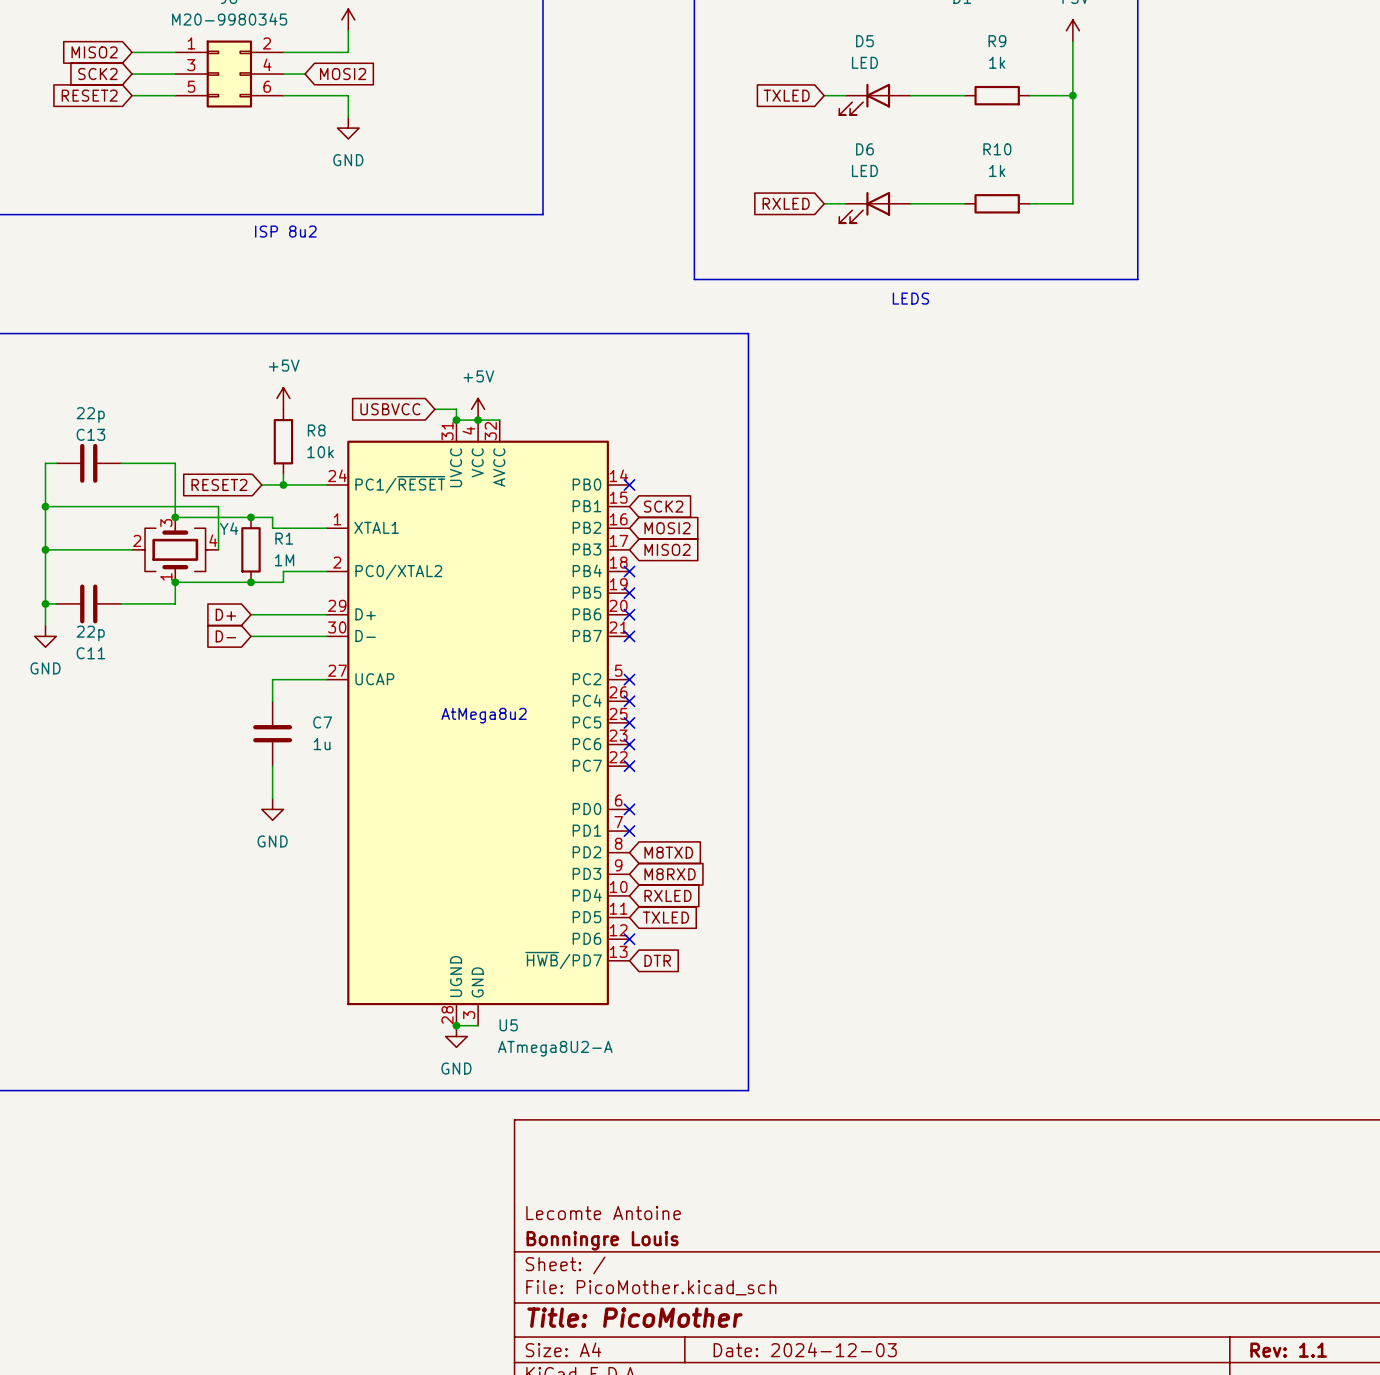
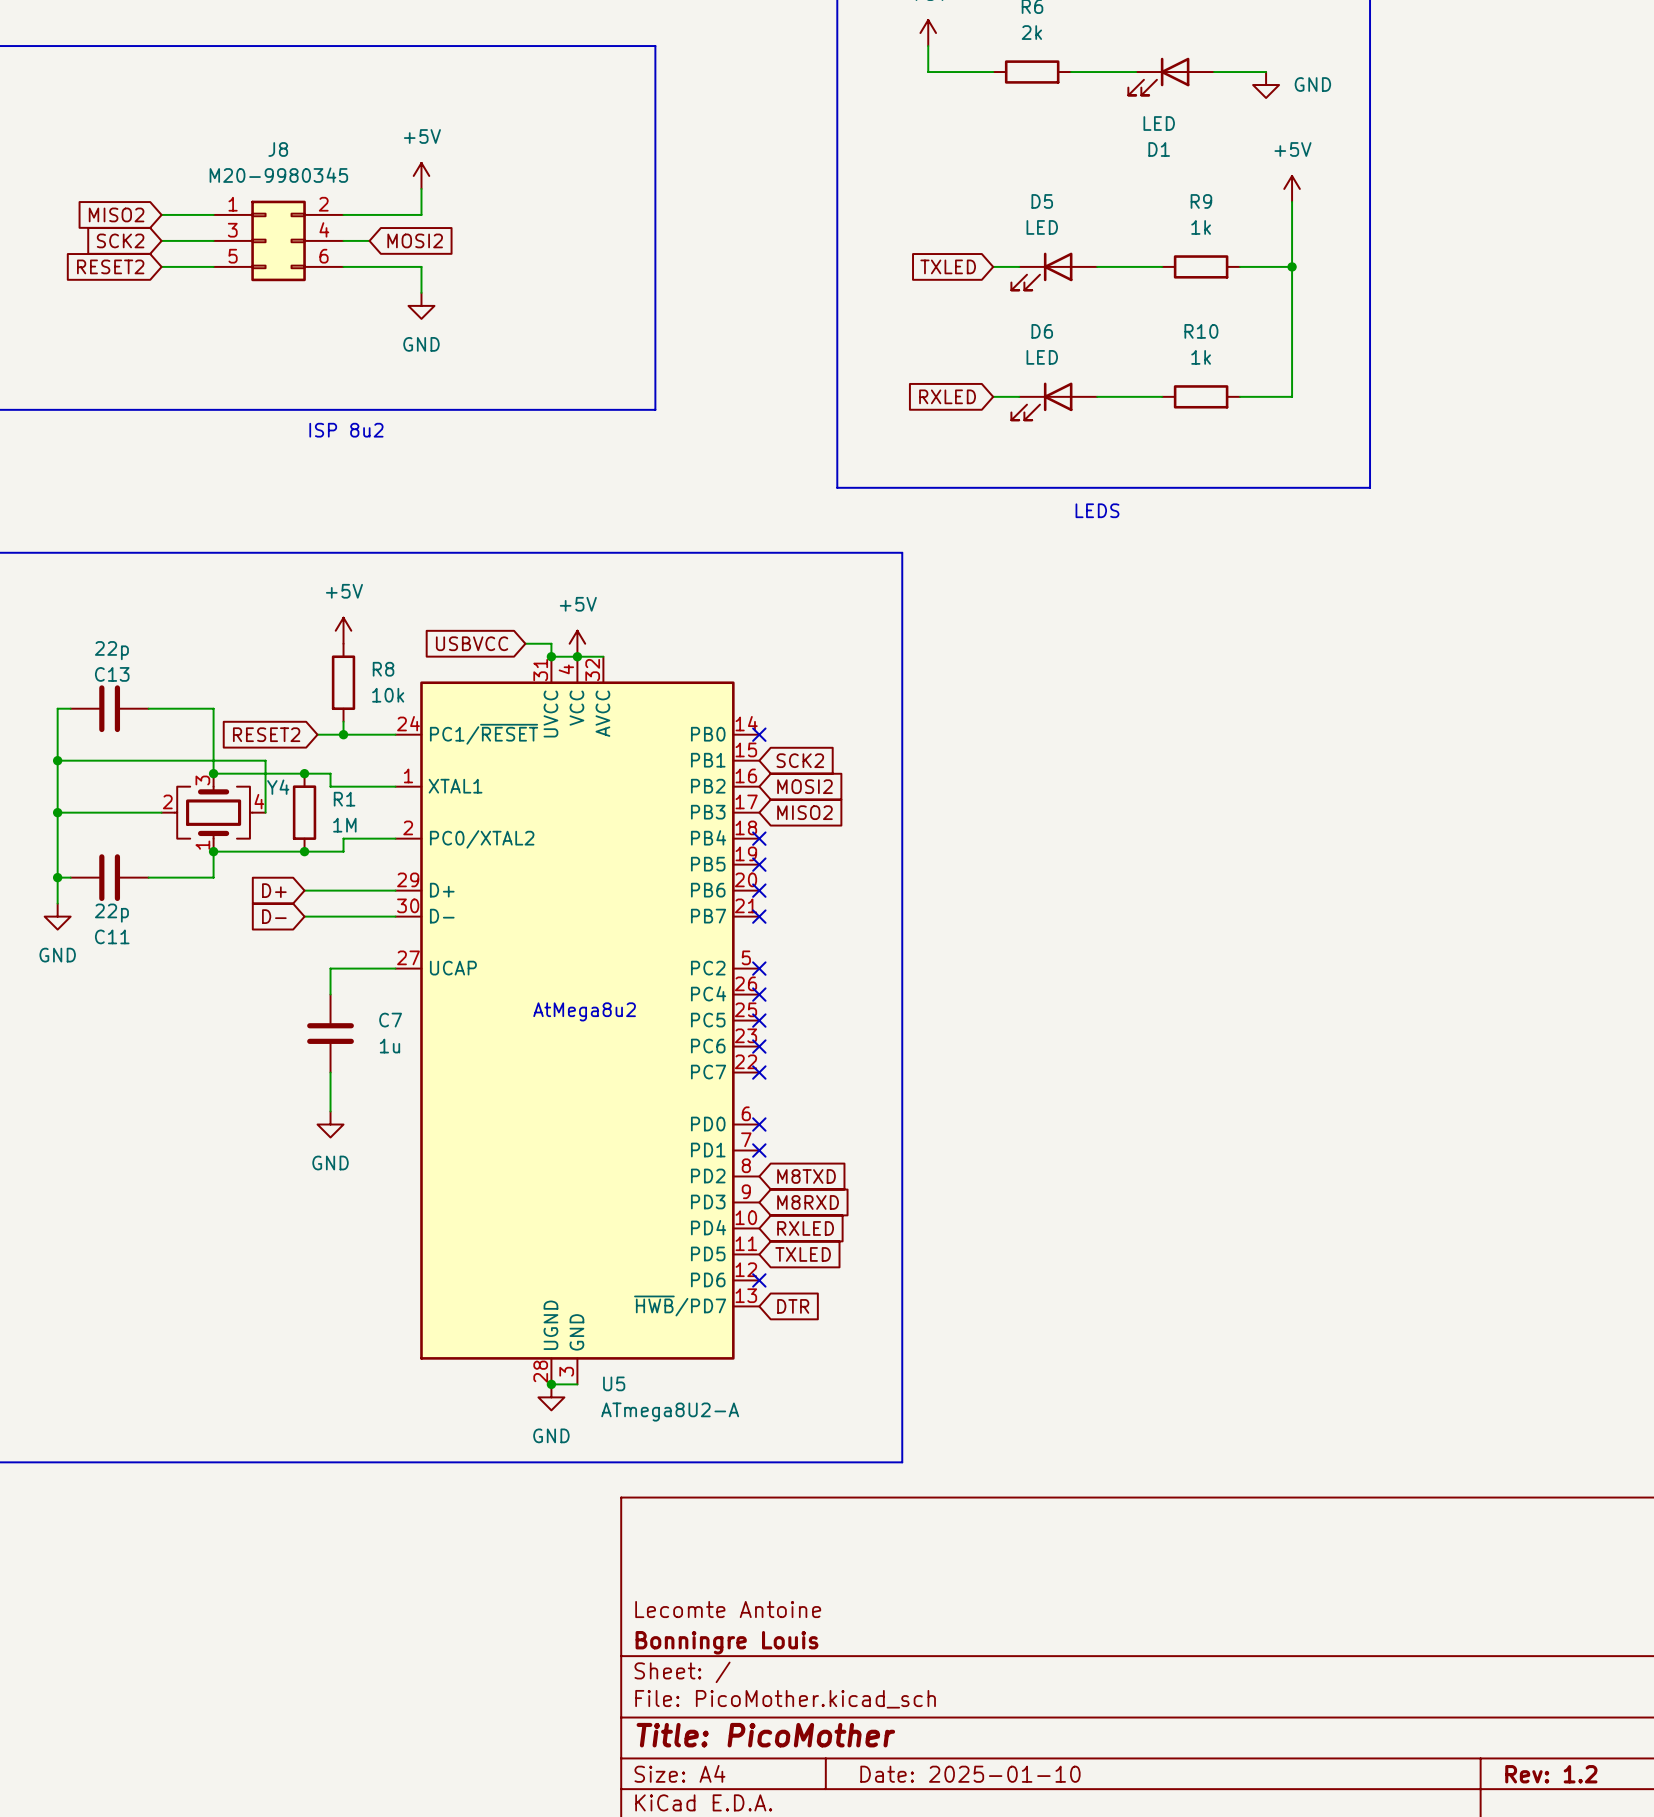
title block: Date: 2024-12-03 (805, 1349) -> Date: 2025-01-10 (970, 1774)
title block: Rev: 1.1 (1288, 1350) -> Rev: 1.2 (1551, 1774)

